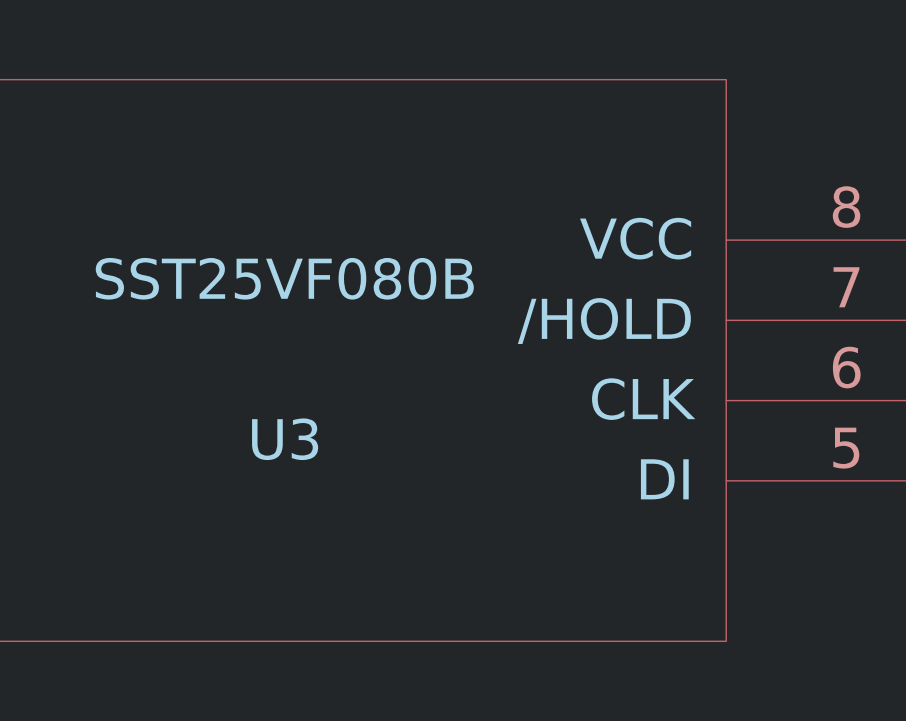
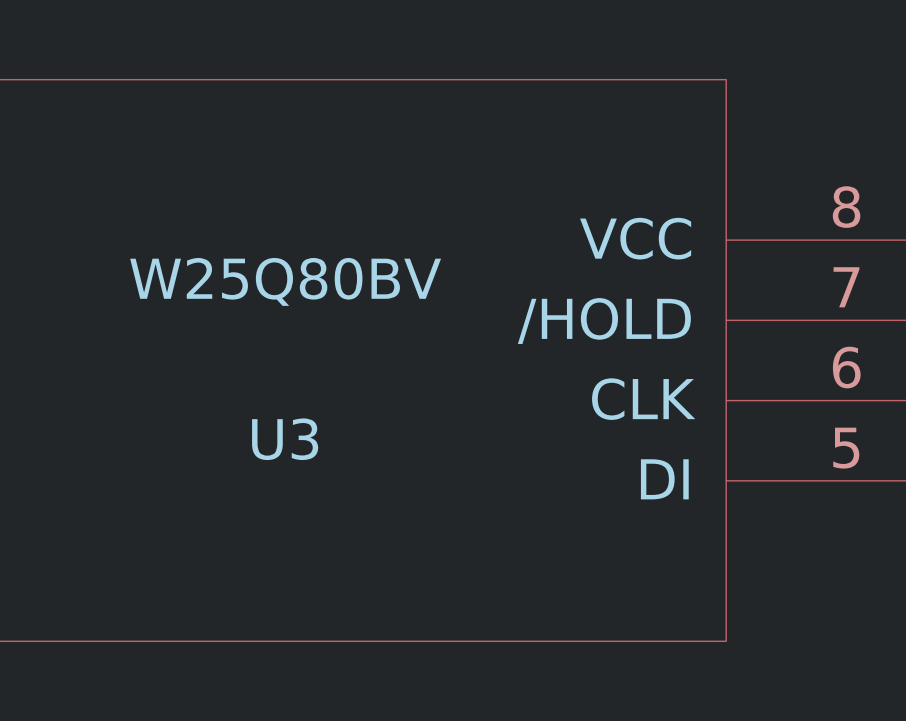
U3 value: SST25VF080B (284, 278) -> W25Q80BV (285, 281)

